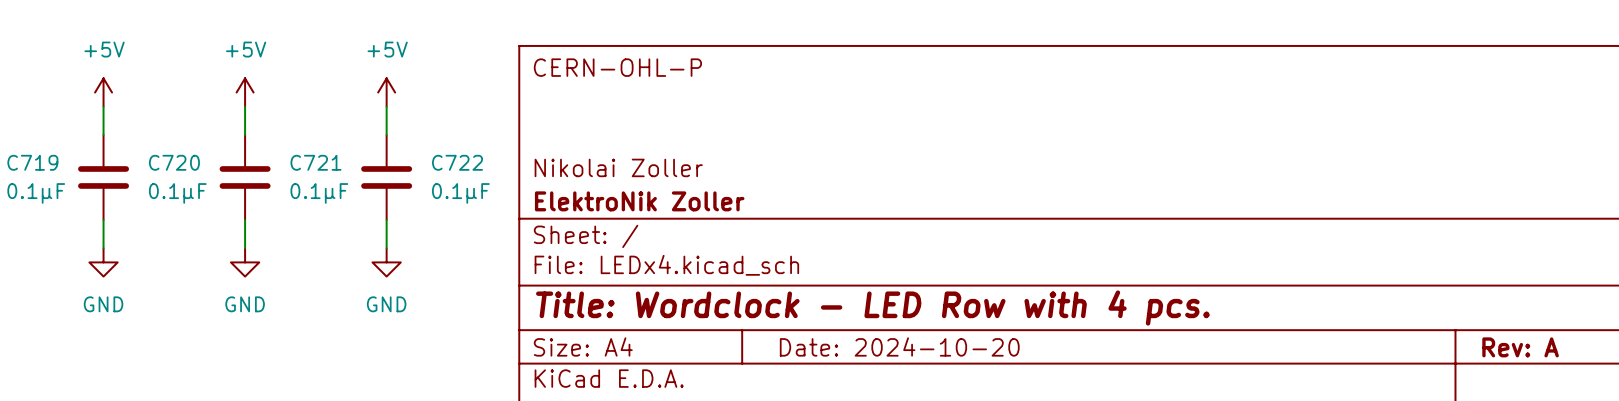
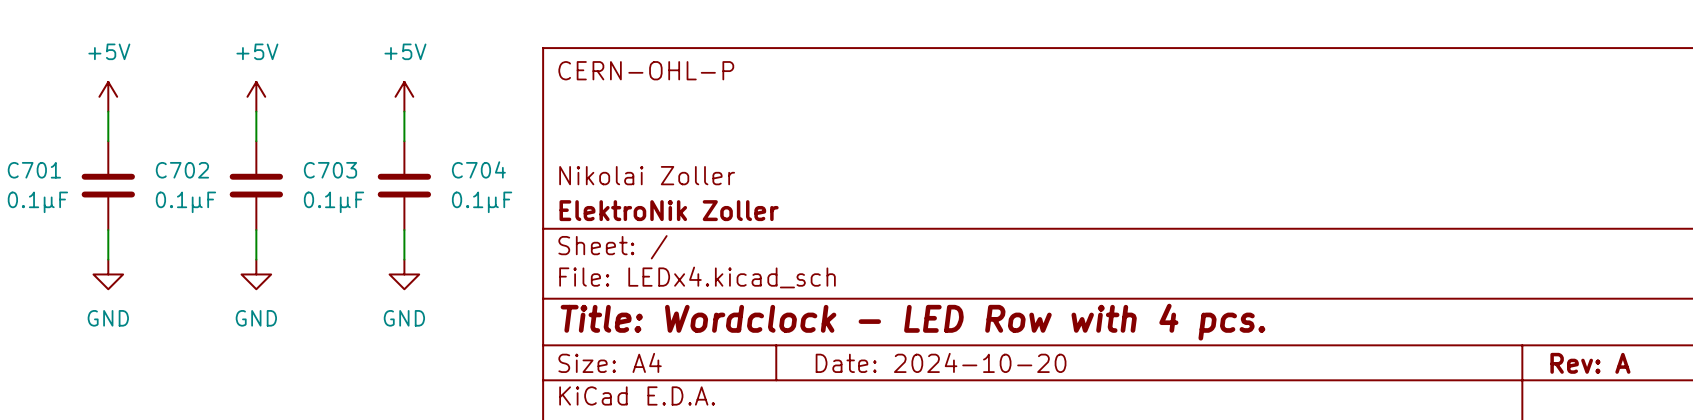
C719 name: C719 (32, 162) -> C701 (34, 170)
C720 name: C720 (174, 162) -> C702 (182, 170)
C721 name: C721 (315, 162) -> C703 (330, 170)
C722 name: C722 (457, 162) -> C704 (478, 169)

